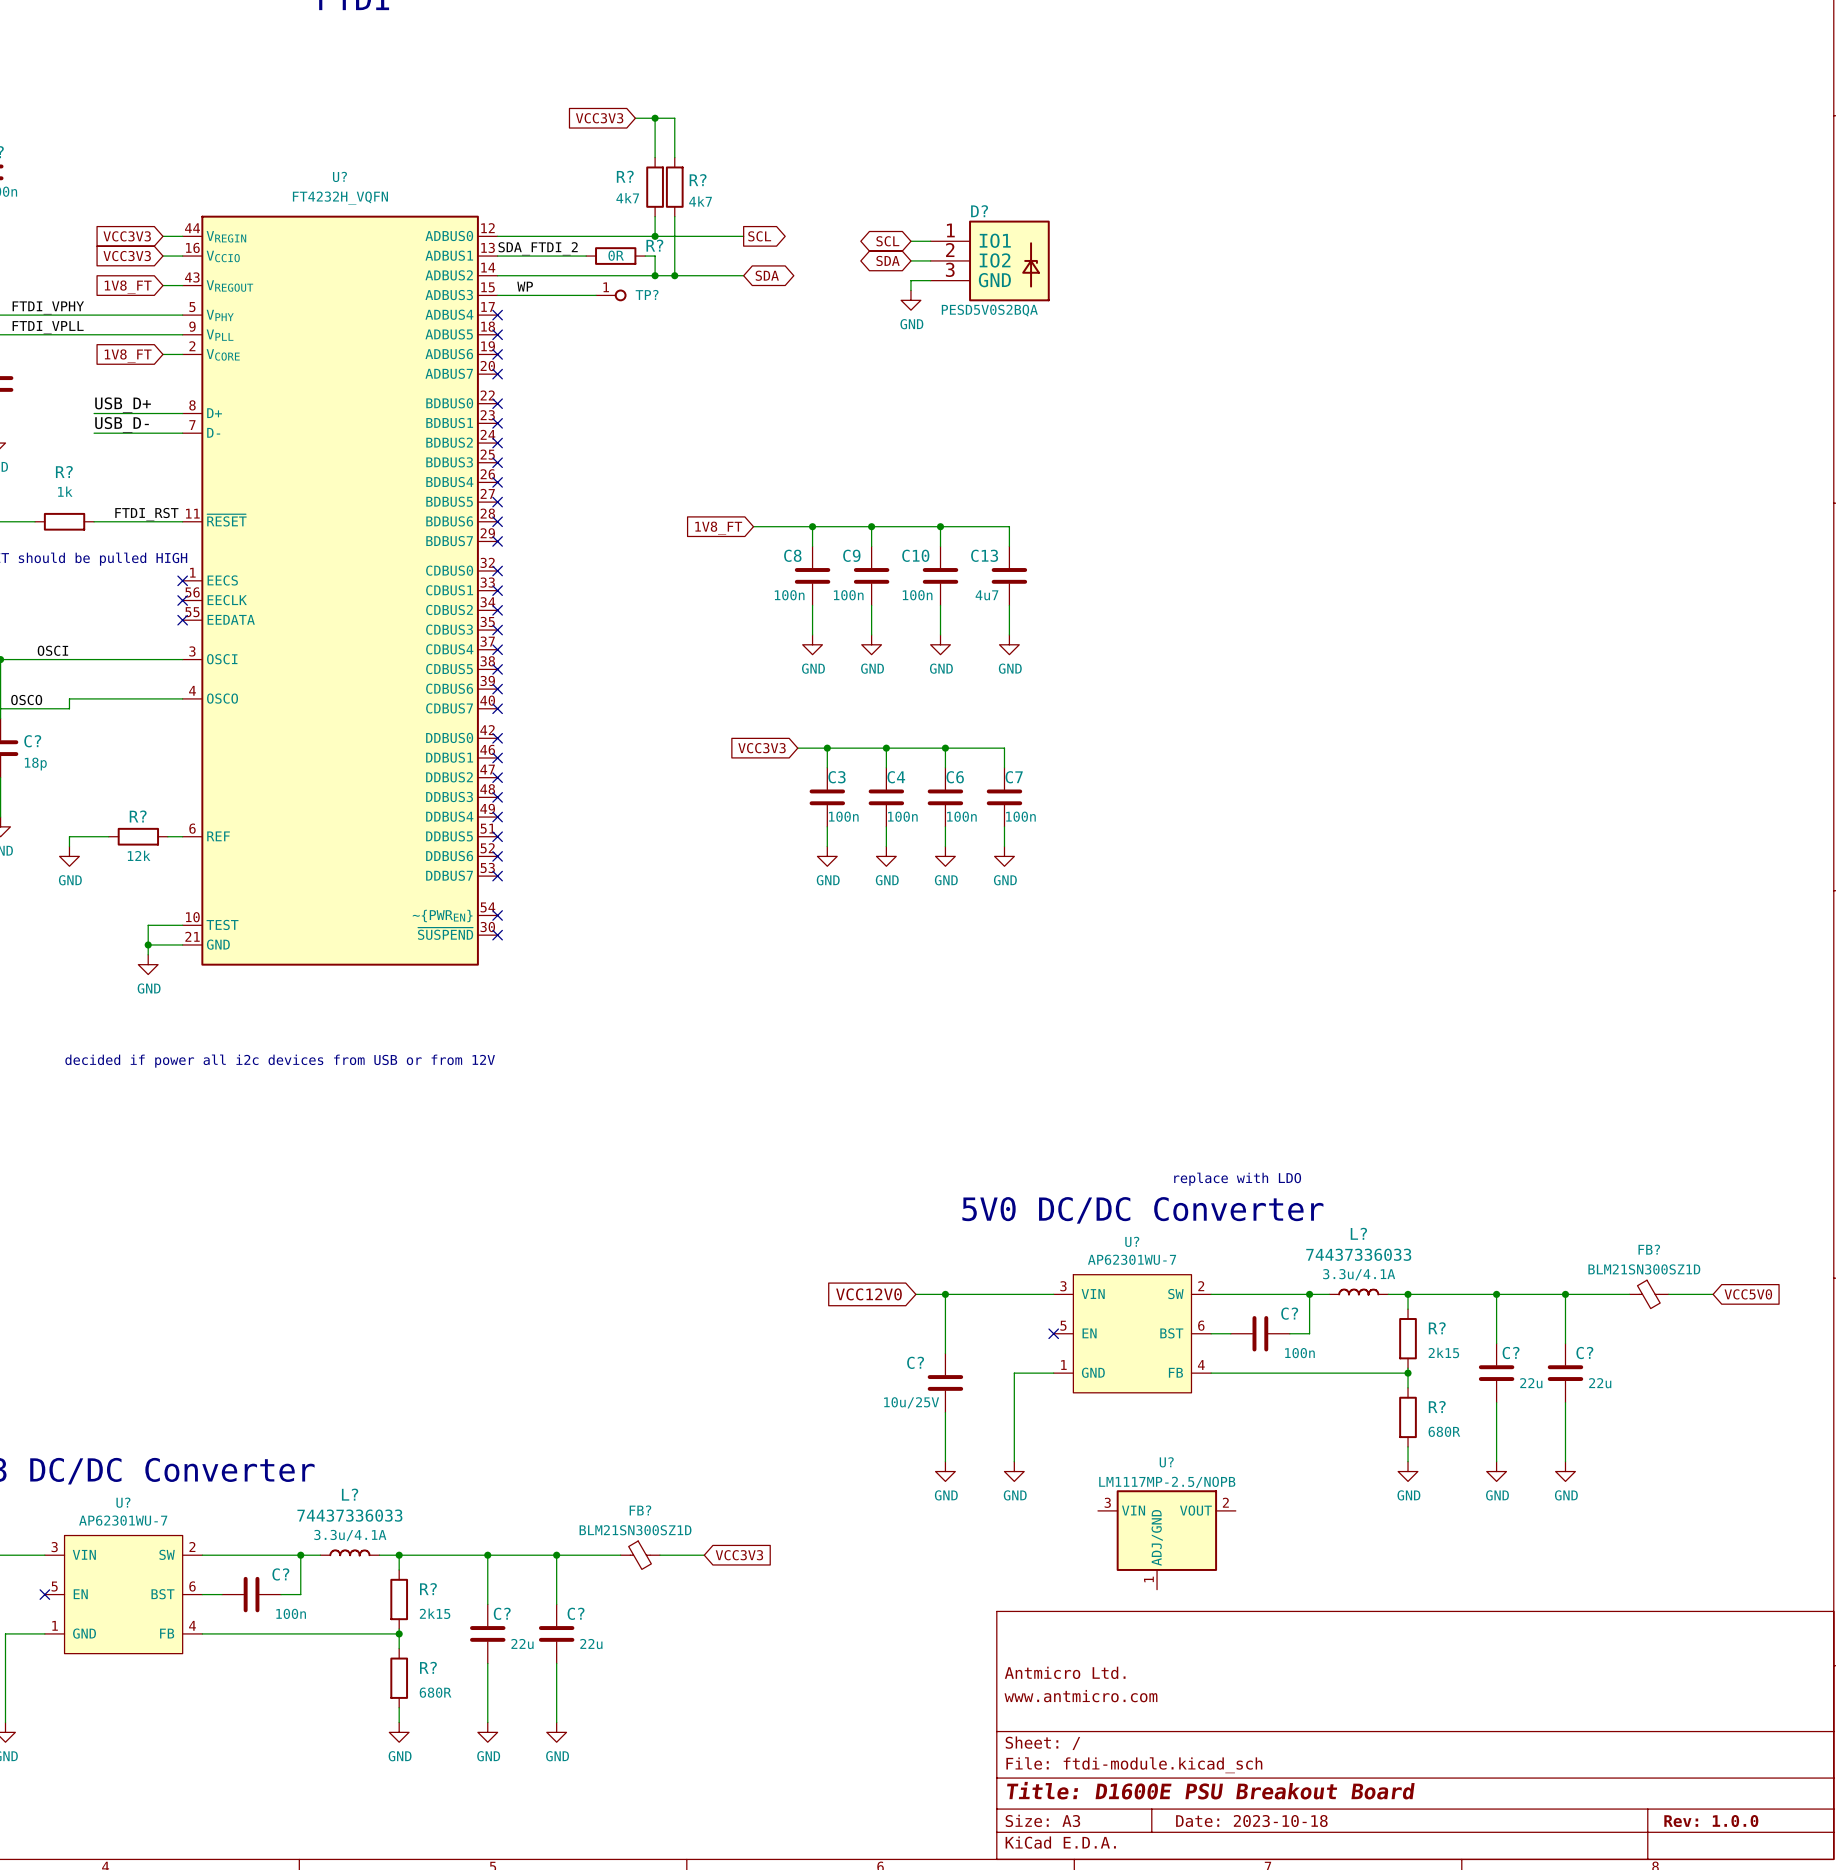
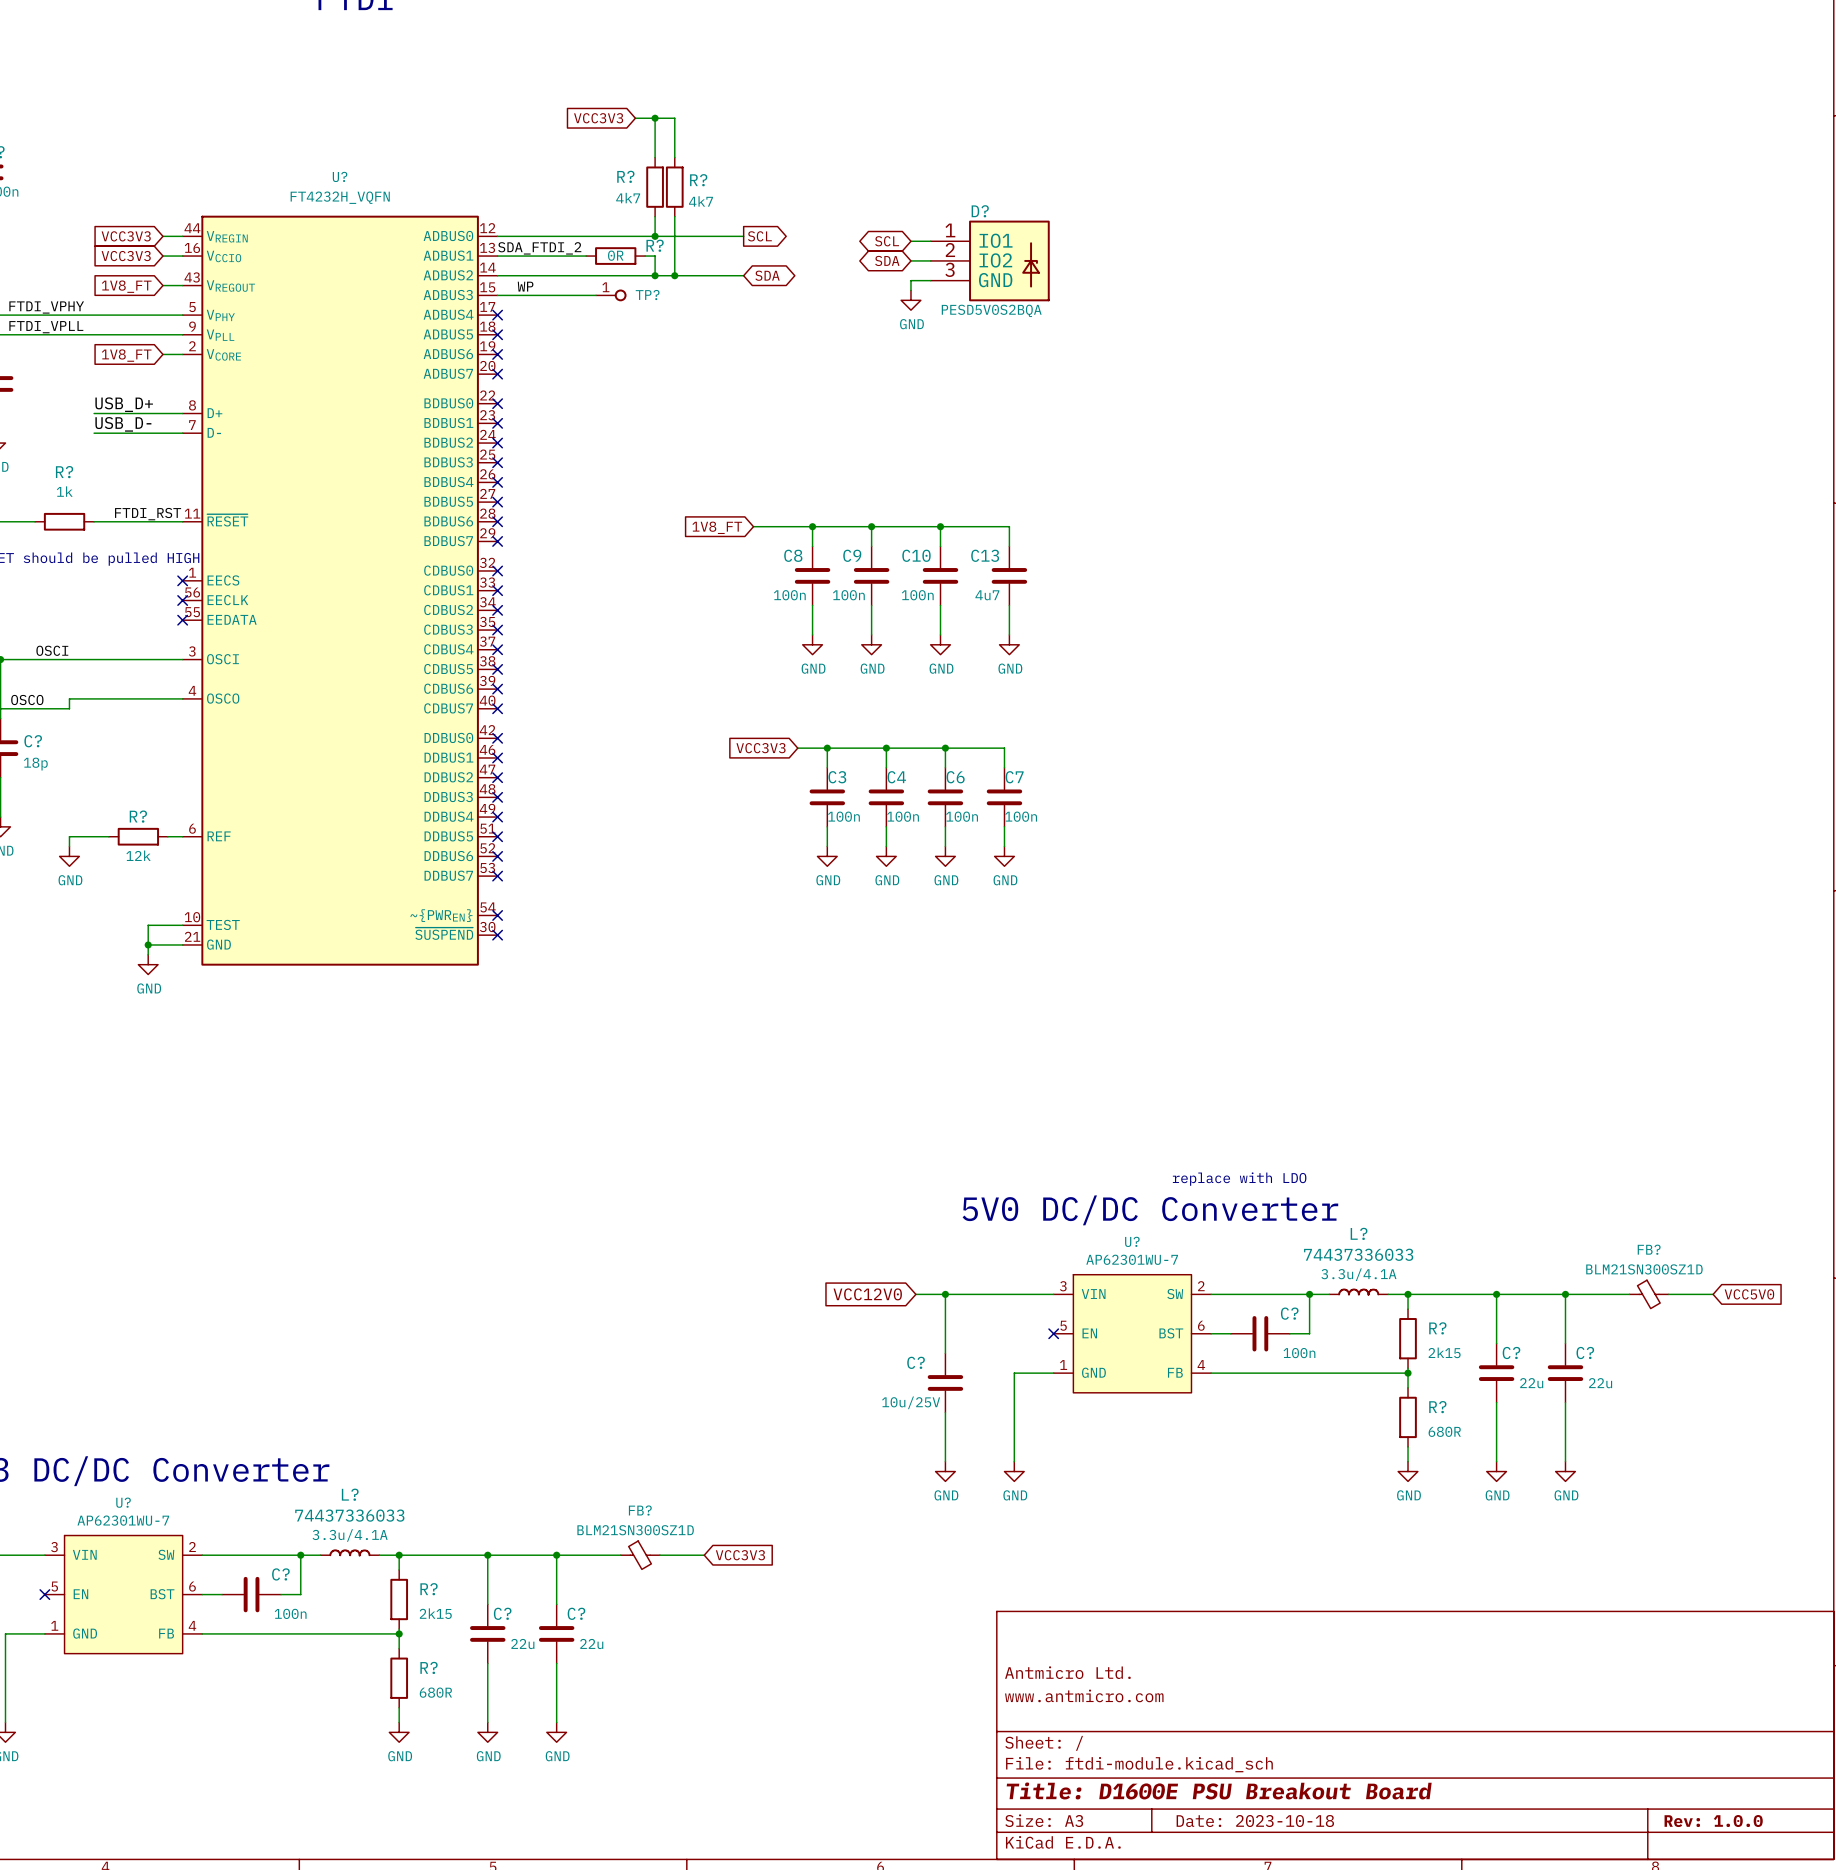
text: decided if power all i2c devices from USB or from 12V (280, 1061) -> none
U?: (1166, 1539) -> none

